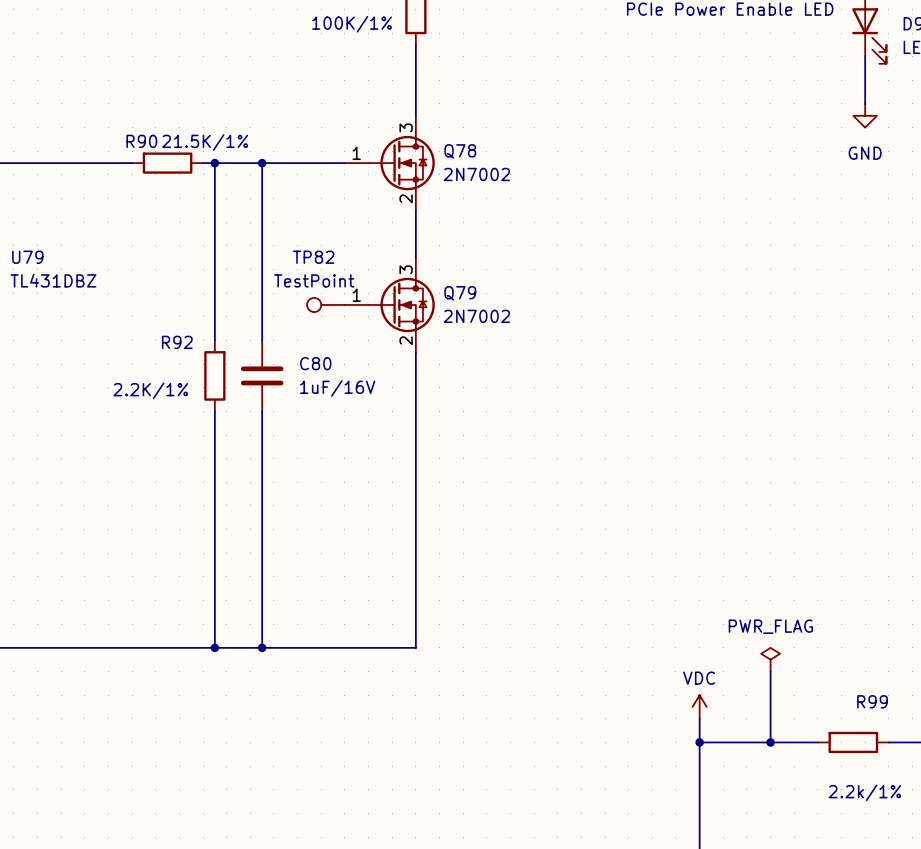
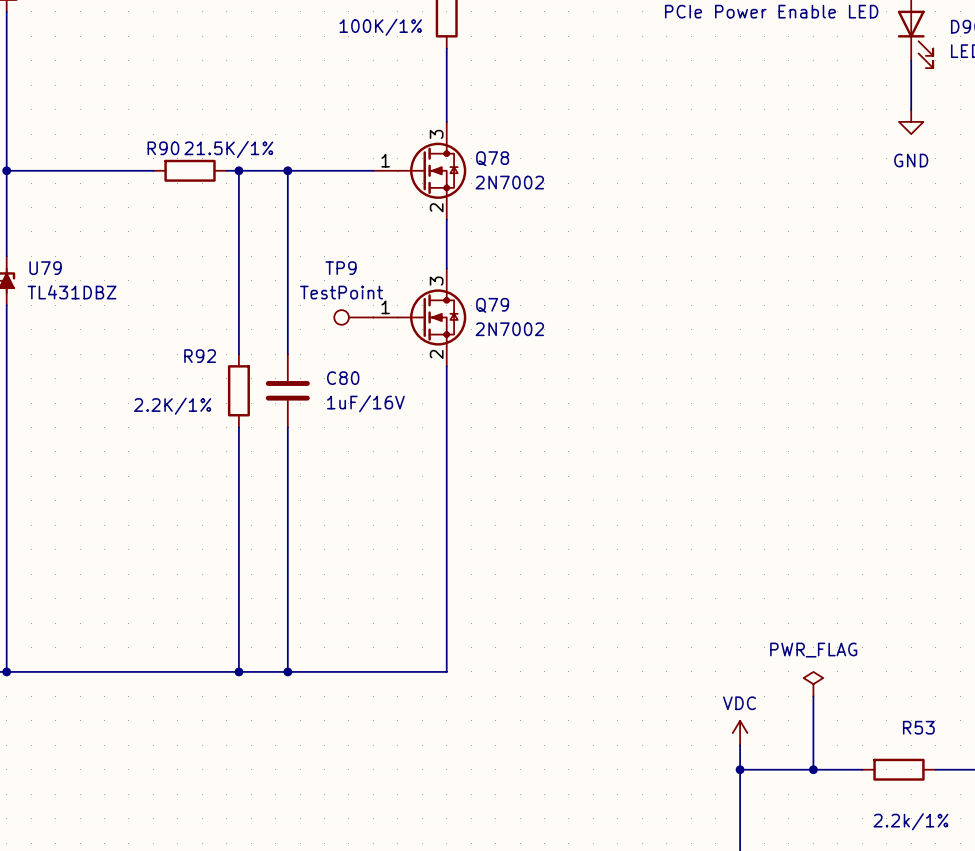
TP82 name: TP82 (313, 257) -> TP9 (341, 268)
R99 name: R99 (872, 701) -> R53 (918, 727)

